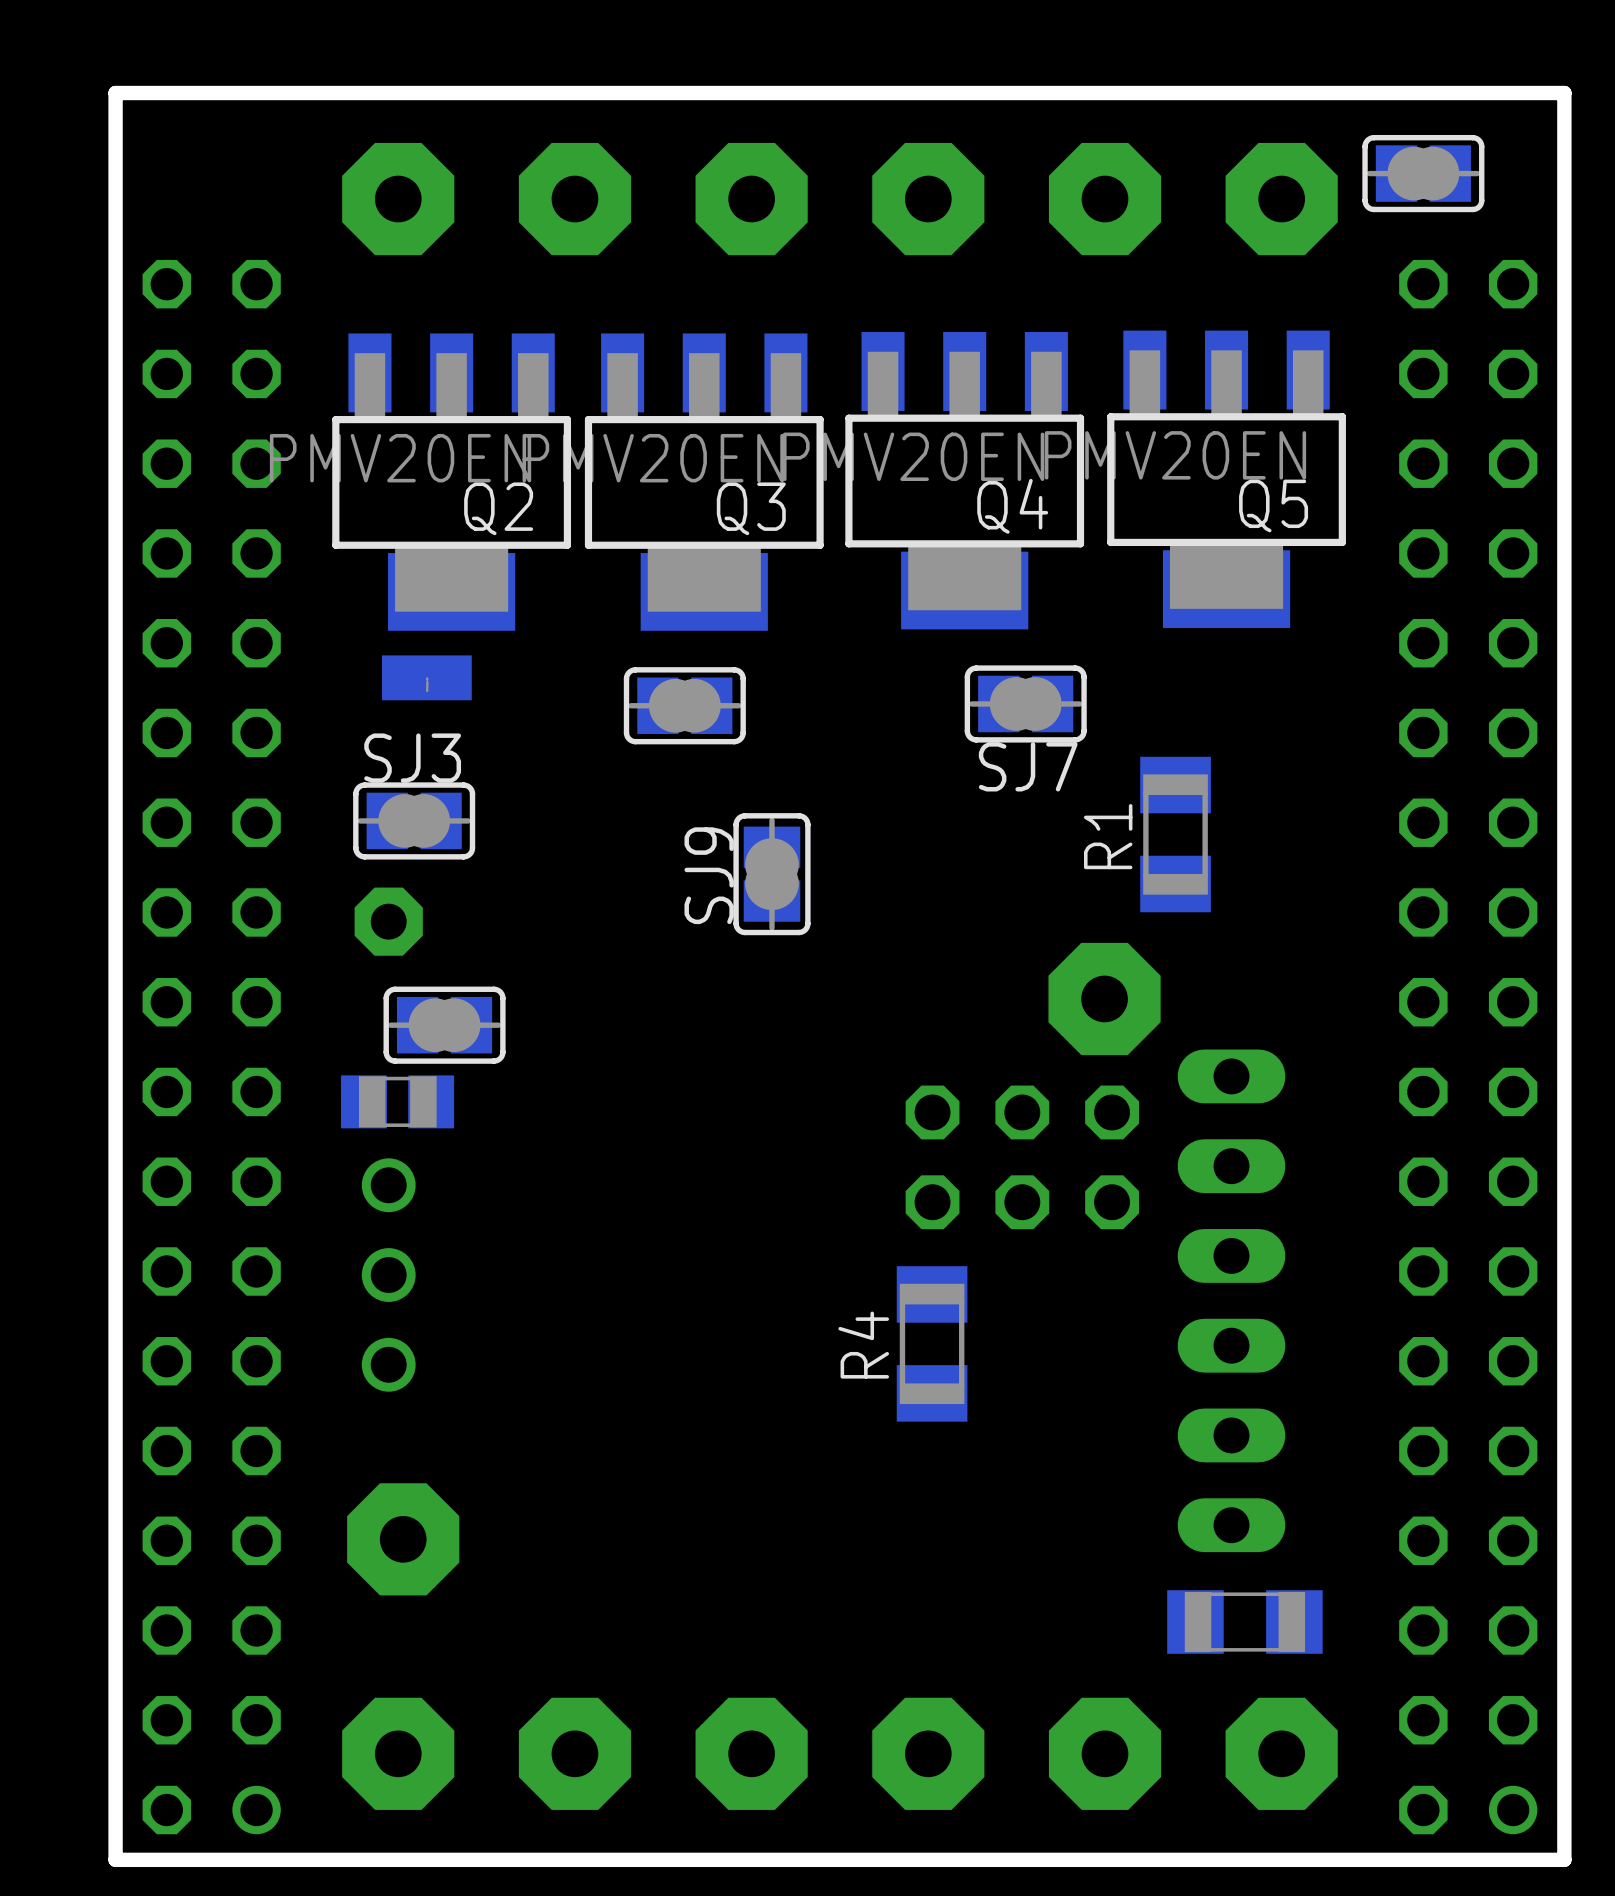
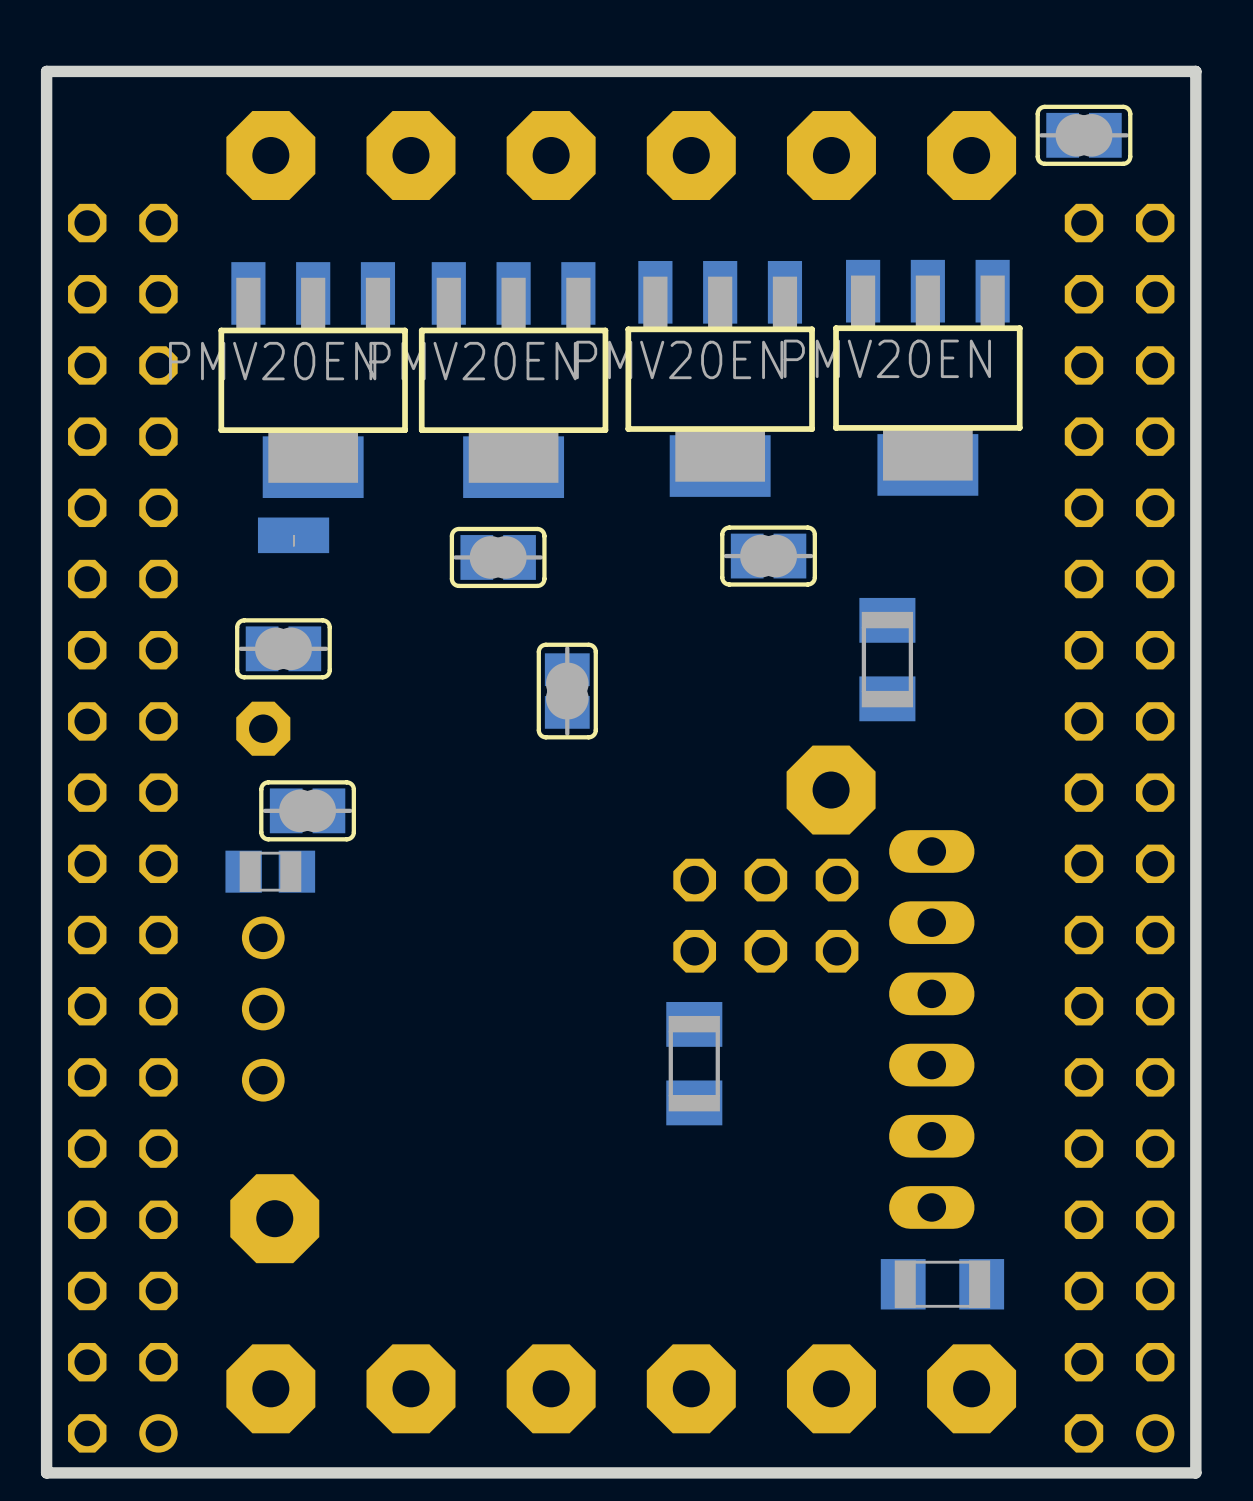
Q5 name: Q5 (1273, 505) -> none
Q4 name: Q4 (1012, 506) -> none
Q2 name: Q2 (498, 508) -> none
Q3 name: Q3 (751, 508) -> none
SJ3 name: SJ3 (412, 758) -> none
SJ7 name: SJ7 (1028, 766) -> none
R1 name: R1 (1108, 836) -> none
SJ9 name: SJ9 (709, 875) -> none
R4 name: R4 (863, 1345) -> none

